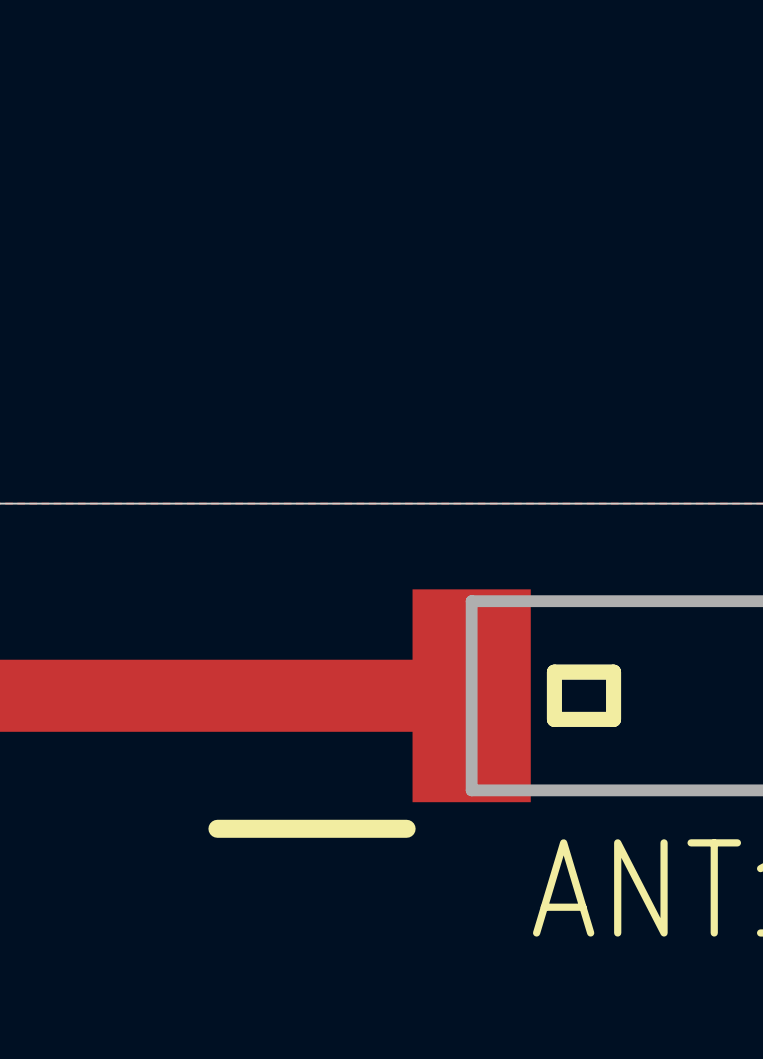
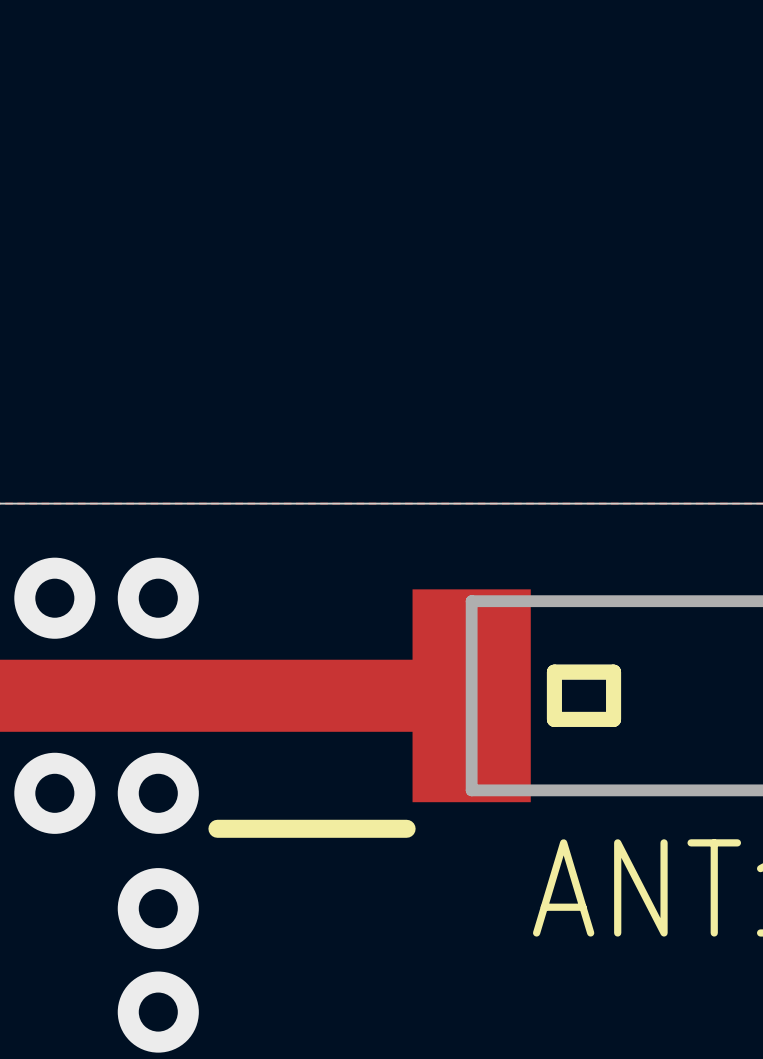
via: none -> (54, 598)
via: none -> (158, 598)
via: none -> (54, 793)
via: none -> (158, 793)
via: none -> (158, 908)
via: none -> (158, 1012)

